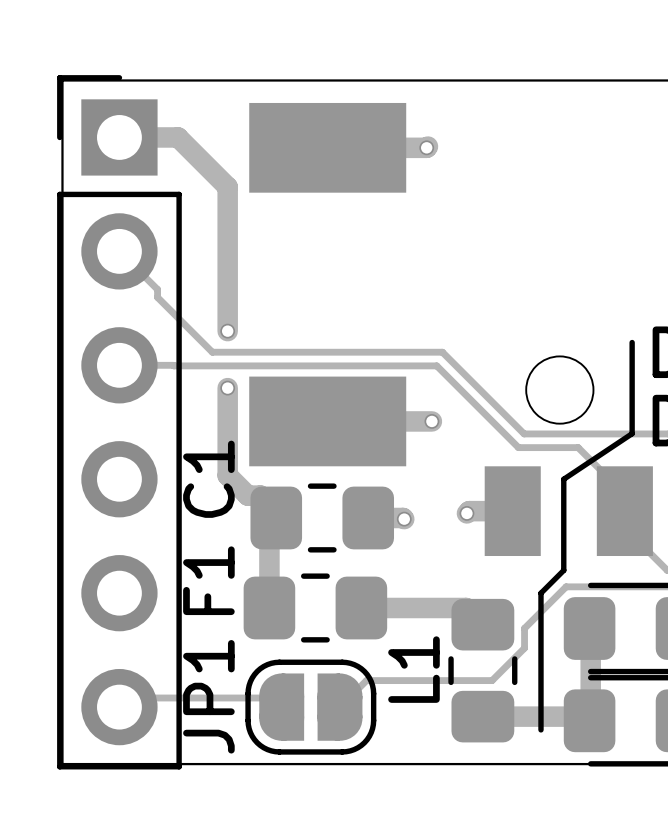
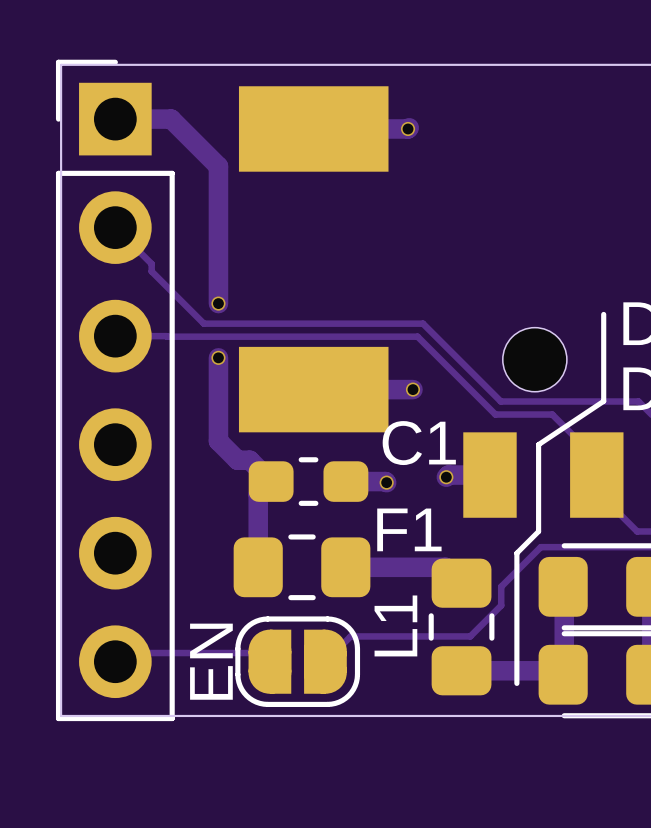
C1 name rotation: 0° (208, 479) -> 90° clockwise (419, 443)
C1 name position: C1 (208, 479) -> C1 (419, 443)
C1 footprint: [250, 483, 395, 553] -> [248, 457, 369, 506]
F1 name rotation: 0° (208, 580) -> 90° clockwise (409, 529)
F1 name position: F1 (208, 580) -> F1 (409, 529)
JP1 name: JP1 (208, 696) -> EN (211, 661)

